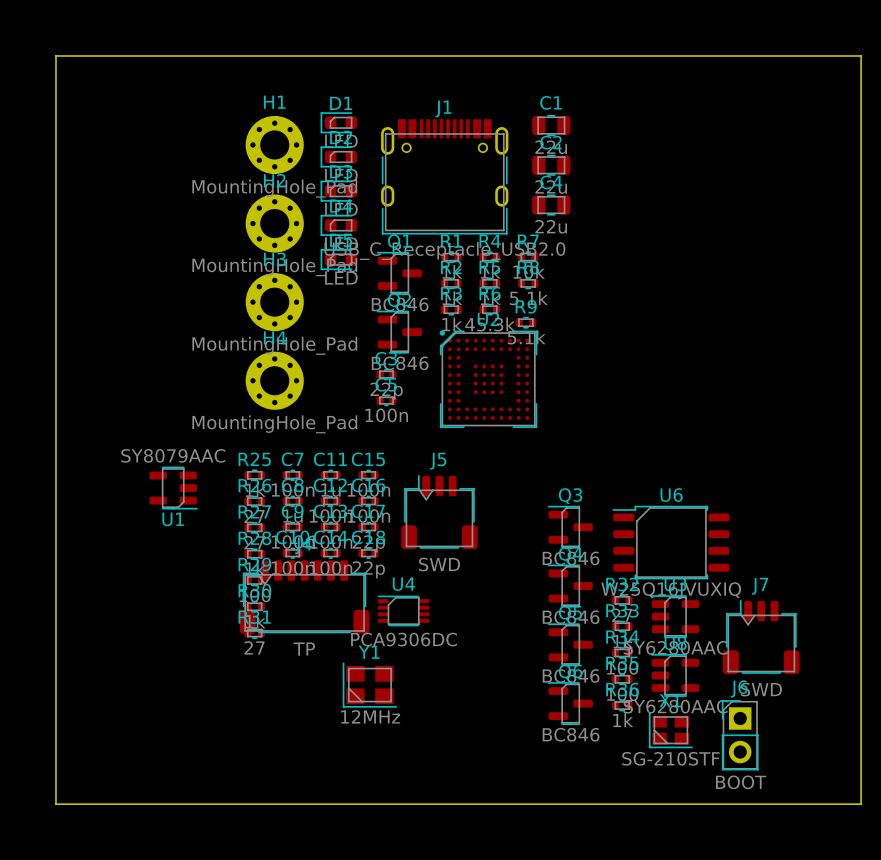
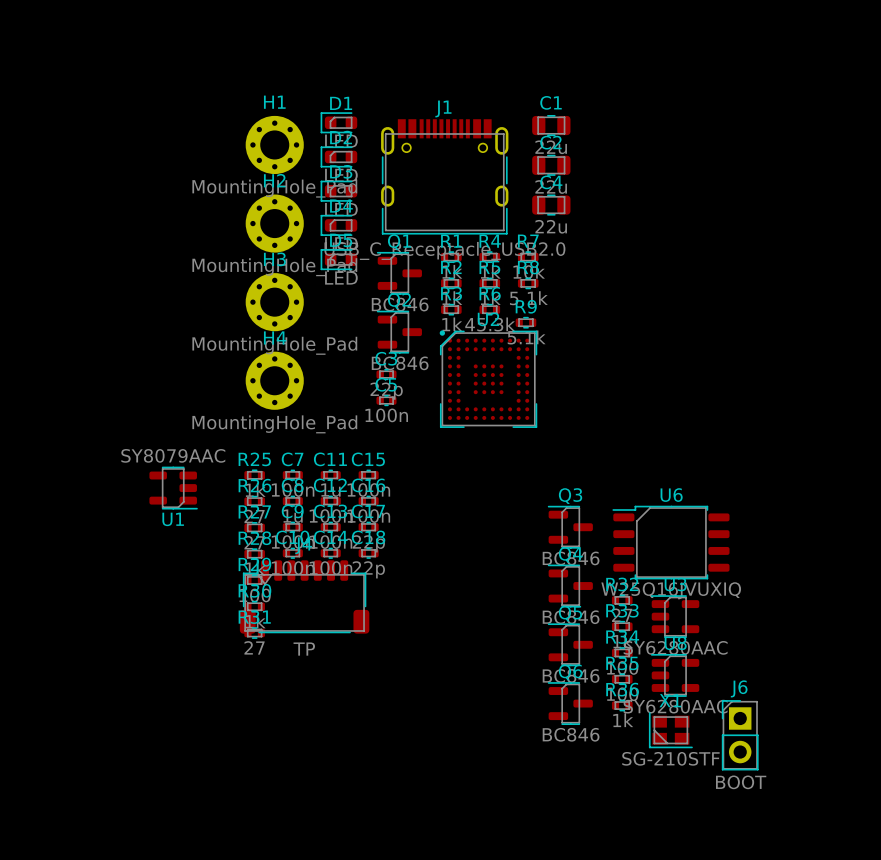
board edge: (56, 56) (861, 56) (861, 804) (56, 804) (56, 56) -> none
J5: SWD (439, 512) -> none
U4: PCA9306DC (403, 610) -> none
J7: SWD (761, 637) -> none
Y1: 12MHz (369, 685) -> none

